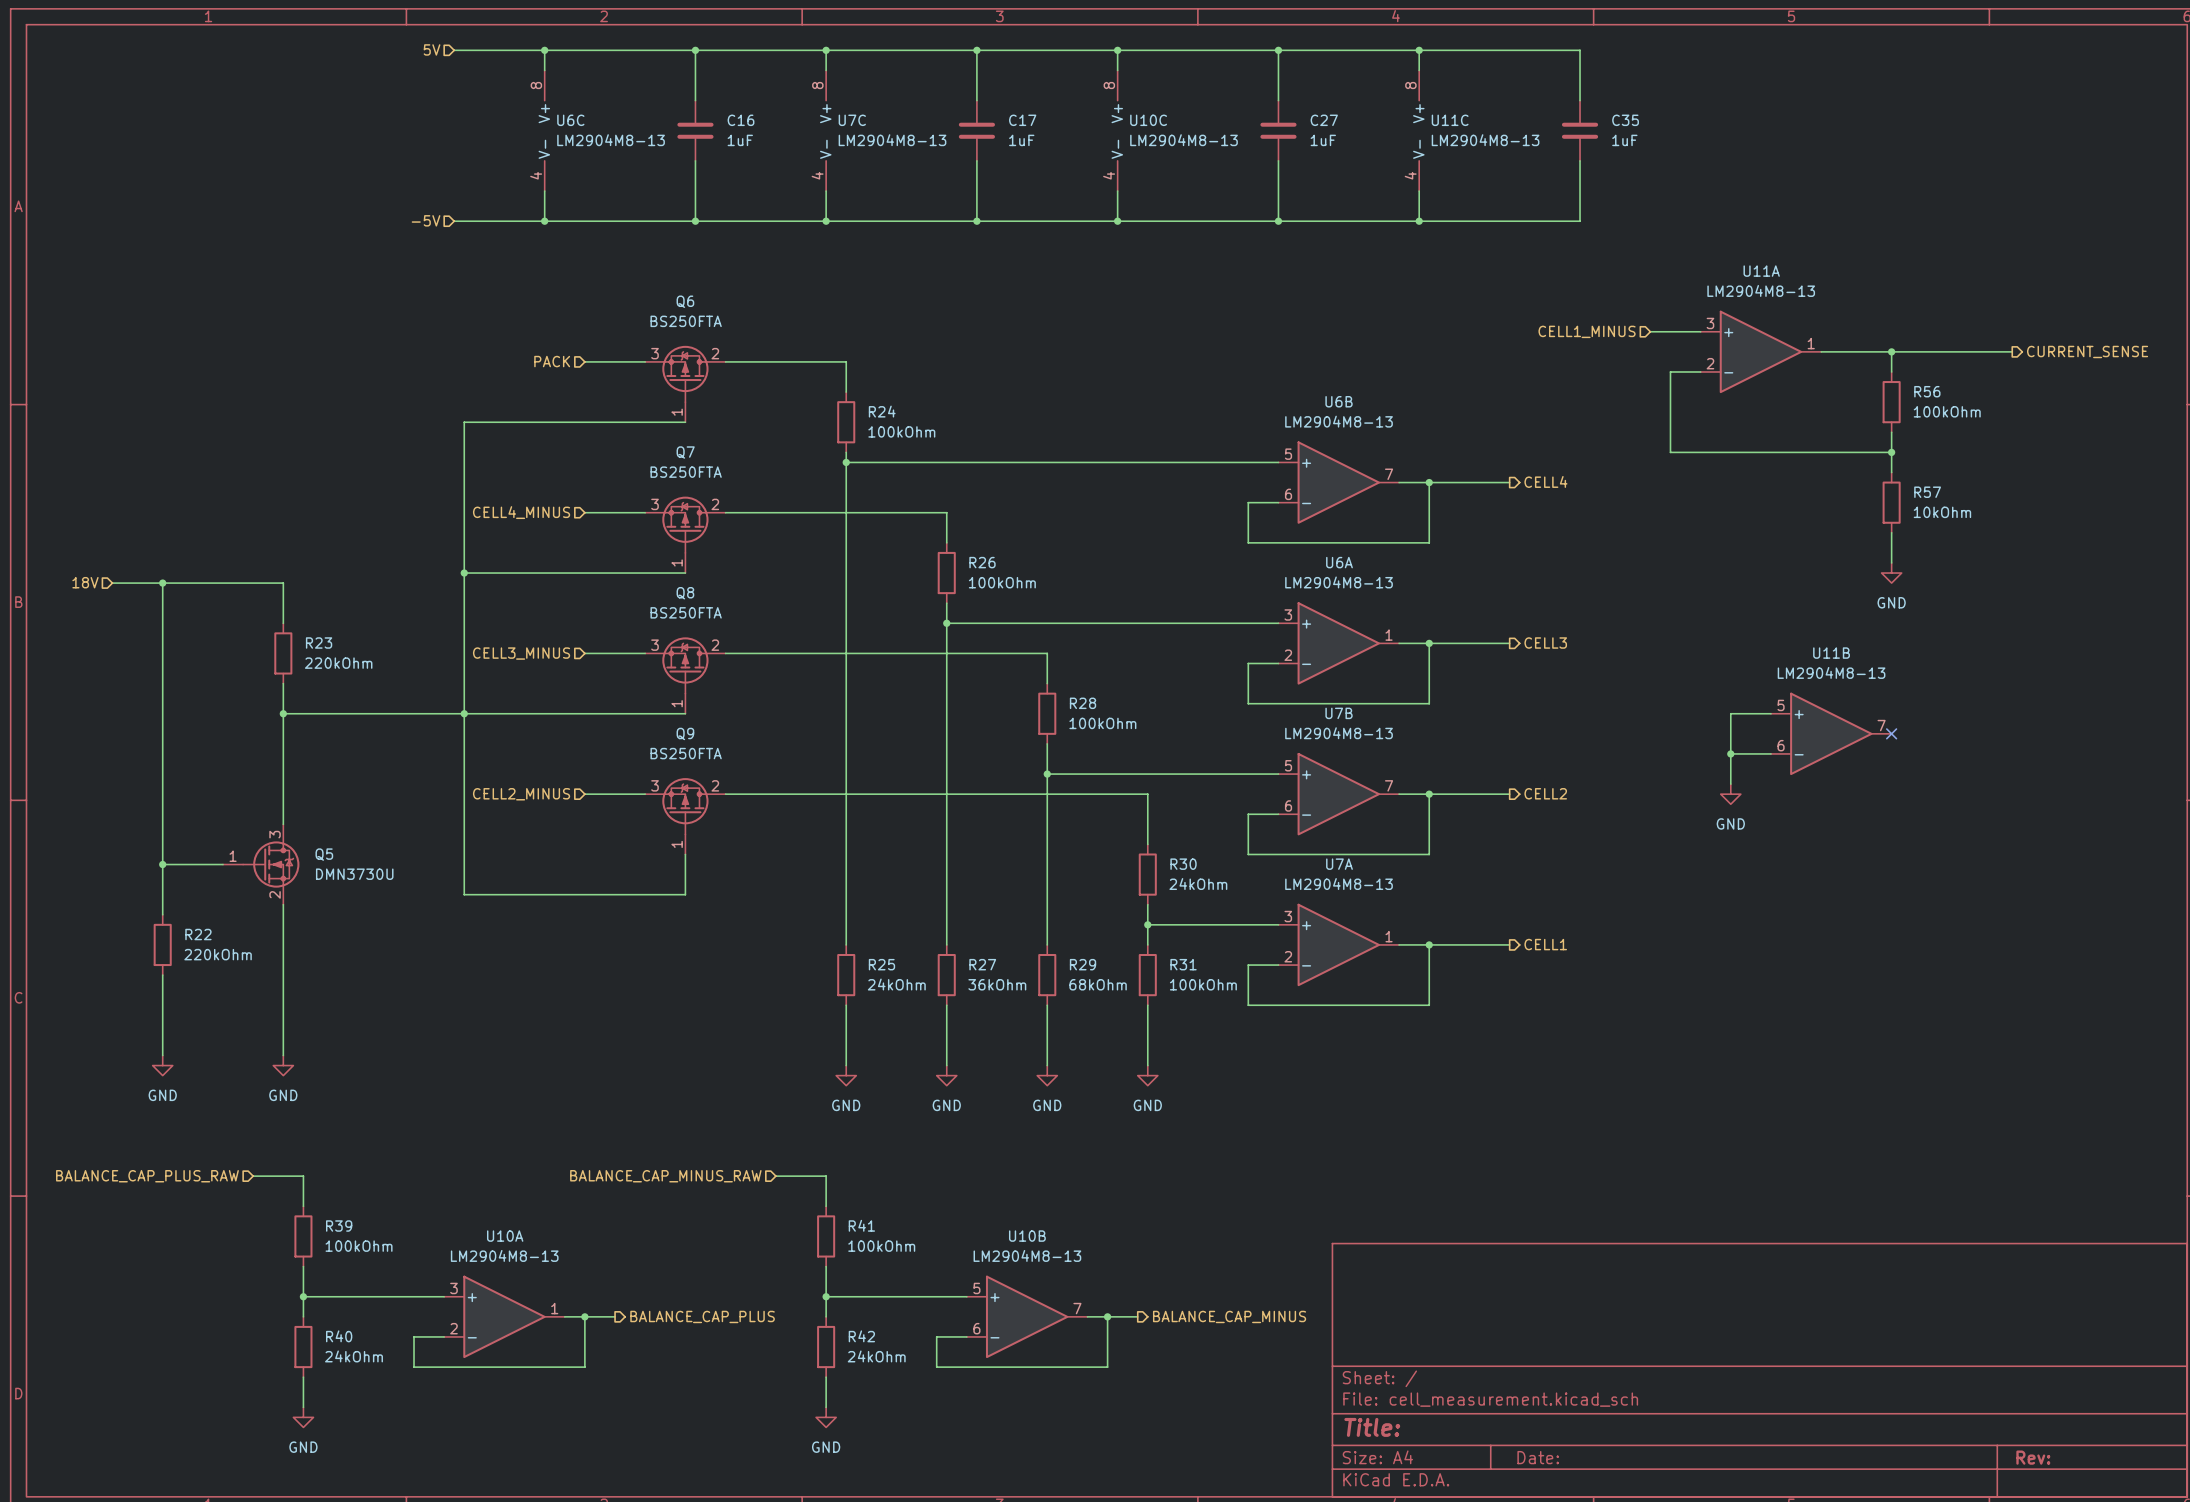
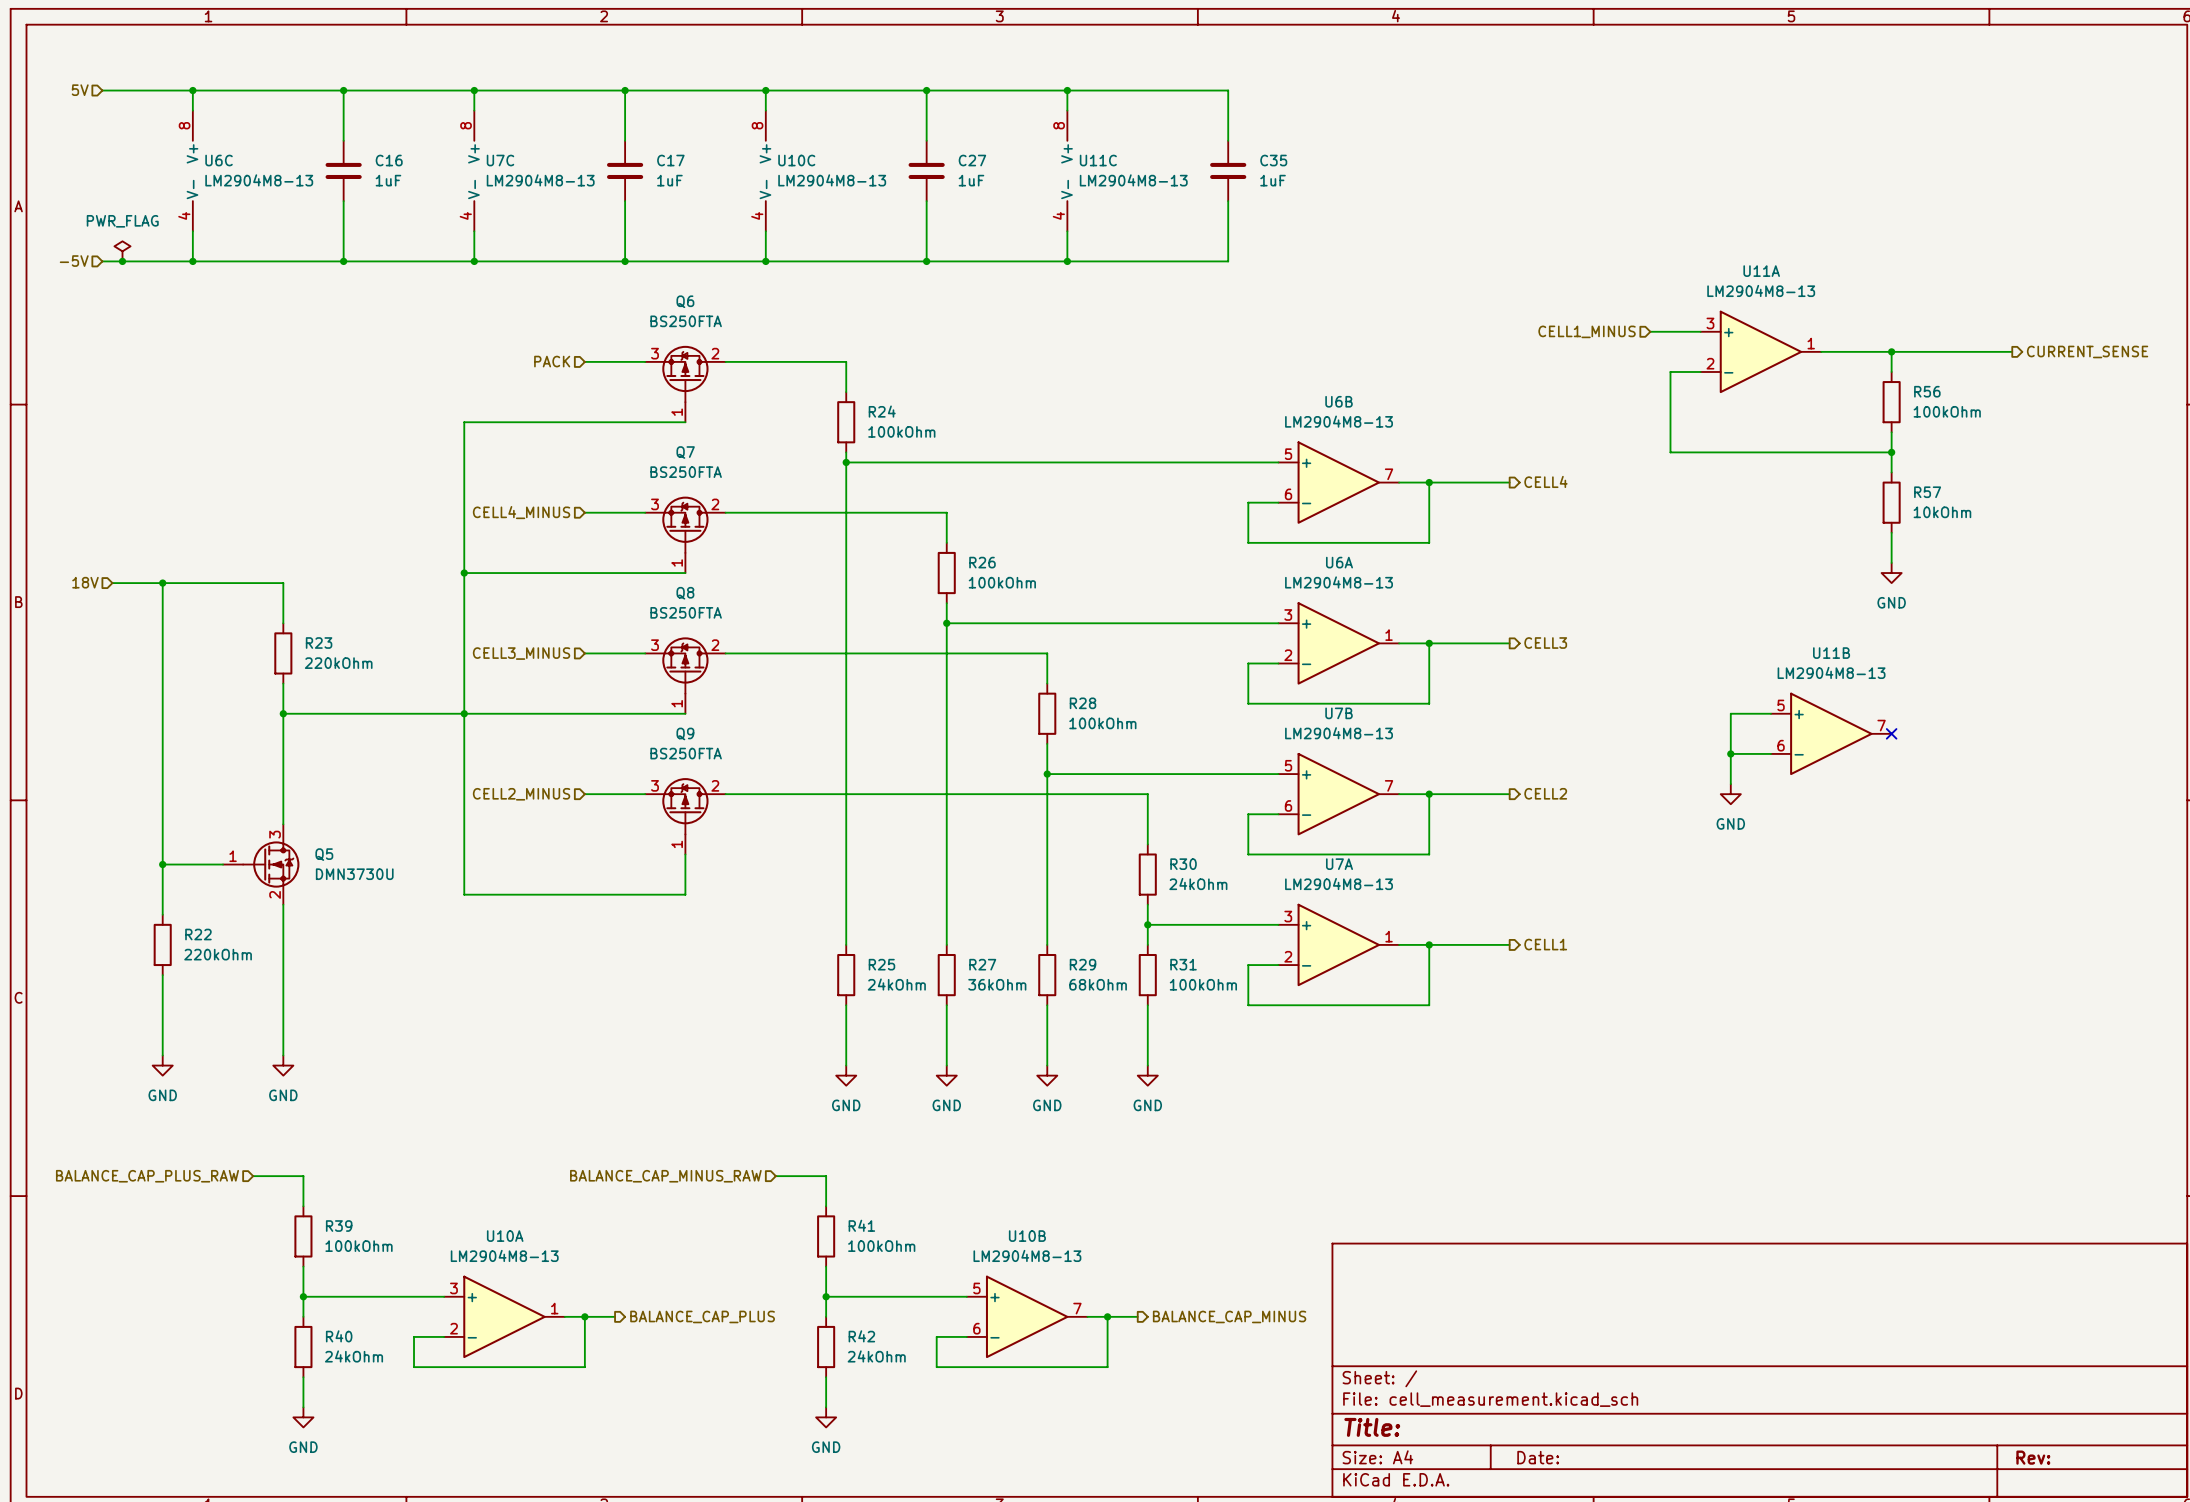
hierarchical label: 5V (432, 49) -> none
wire: (454, 50) (1580, 50) (1580, 100) -> none
wire: (544, 50) (544, 70) -> (474, 90) (474, 110)
junction: (544, 50) -> none
wire: (695, 50) (695, 100) -> (625, 90) (625, 140)
junction: (695, 50) -> none
wire: (826, 50) (826, 70) -> (765, 90) (765, 110)
junction: (826, 50) -> none
wire: (976, 50) (976, 100) -> (926, 90) (926, 140)
junction: (976, 50) -> none
wire: (1117, 50) (1117, 70) -> (1067, 90) (1067, 110)
junction: (1117, 50) -> none
wire: (1278, 50) (1278, 100) -> none
junction: (1278, 50) -> none
wire: (1419, 50) (1419, 70) -> none
junction: (1419, 50) -> none
hierarchical label: none -> 5V (80, 90)
wire: none -> (102, 90) (1228, 90) (1228, 140)
wire: none -> (192, 90) (192, 110)
junction: none -> (192, 90)
wire: none -> (343, 90) (343, 140)
junction: none -> (343, 90)
junction: none -> (474, 90)
junction: none -> (625, 90)
junction: none -> (765, 90)
junction: none -> (926, 90)
junction: none -> (1067, 90)
U6C position: (544, 130) -> (192, 170)
C16 position: (695, 130) -> (343, 170)
U7C position: (826, 130) -> (474, 170)
C17 position: (976, 130) -> (625, 170)
U10C position: (1117, 130) -> (765, 170)
C27 position: (1278, 130) -> (926, 170)
U11C position: (1419, 130) -> (1067, 170)
C35 position: (1580, 130) -> (1228, 170)
wire: (695, 160) (695, 221) -> (625, 201) (625, 261)
wire: (976, 160) (976, 221) -> (926, 201) (926, 261)
wire: (1278, 160) (1278, 221) -> none
wire: (1580, 160) (1580, 221) (454, 221) -> none
wire: (544, 191) (544, 221) -> (474, 231) (474, 261)
wire: (826, 191) (826, 221) -> (765, 231) (765, 261)
wire: (1117, 191) (1117, 221) -> (1067, 231) (1067, 261)
wire: (1419, 191) (1419, 221) -> none
wire: none -> (343, 201) (343, 261)
wire: none -> (1228, 201) (1228, 261) (102, 261)
hierarchical label: -5V (426, 220) -> none
junction: (544, 221) -> none
junction: (695, 221) -> none
junction: (826, 221) -> none
junction: (976, 221) -> none
junction: (1117, 221) -> none
junction: (1278, 221) -> none
junction: (1419, 221) -> none
wire: none -> (192, 231) (192, 261)
power symbol: none -> PWR_FLAG (122, 251)
hierarchical label: none -> -5V (74, 261)
junction: none -> (122, 261)
junction: none -> (192, 261)
junction: none -> (343, 261)
junction: none -> (474, 261)
junction: none -> (625, 261)
junction: none -> (765, 261)
junction: none -> (926, 261)
junction: none -> (1067, 261)

